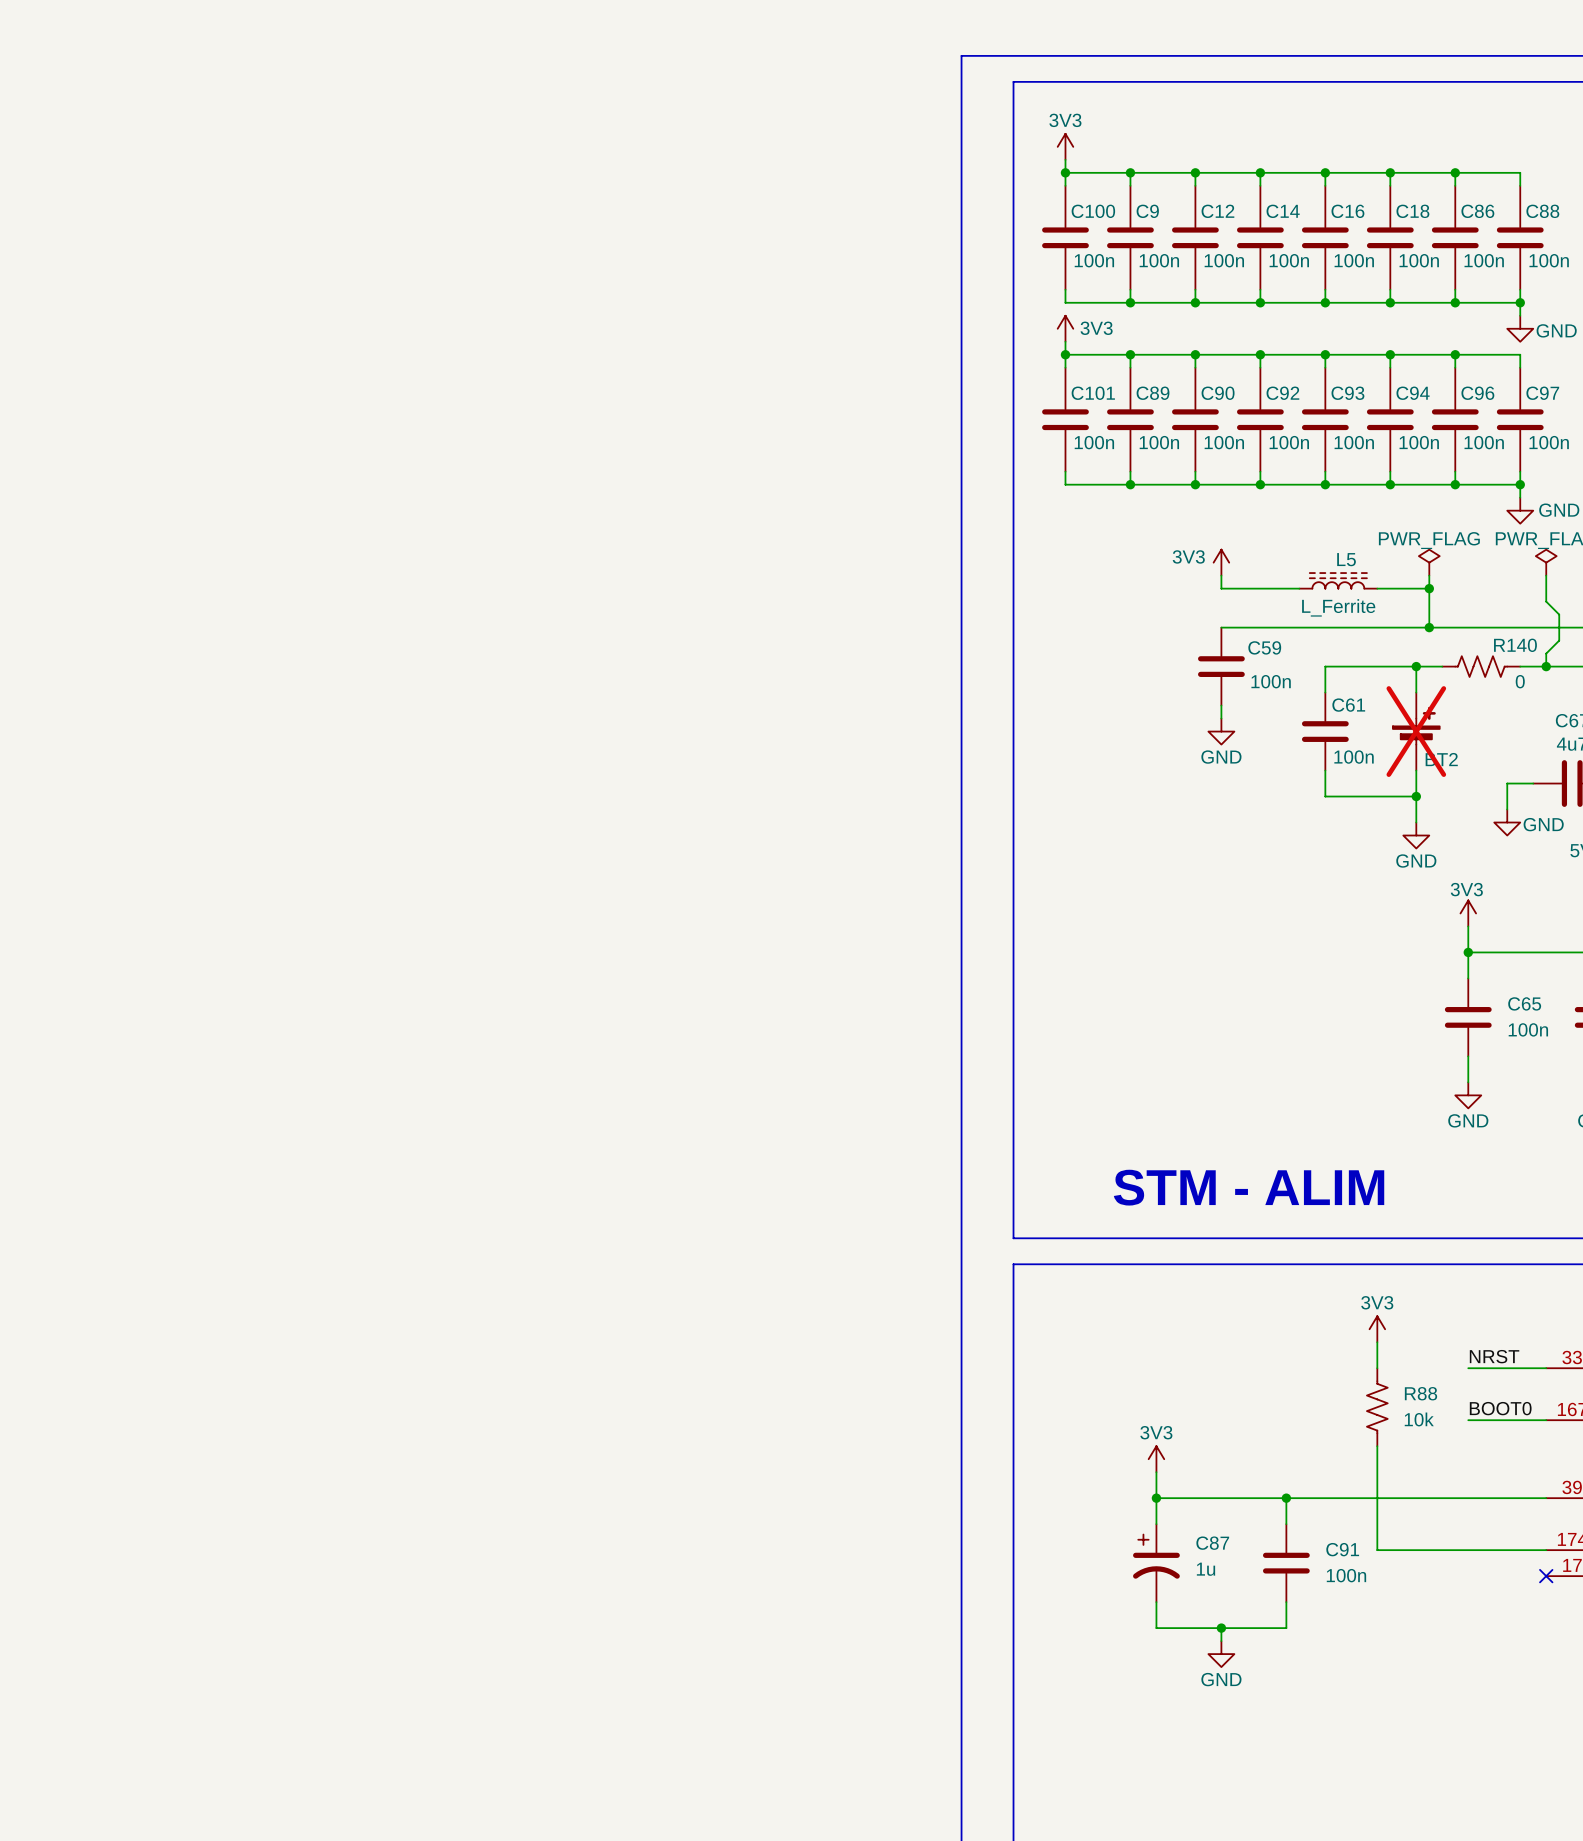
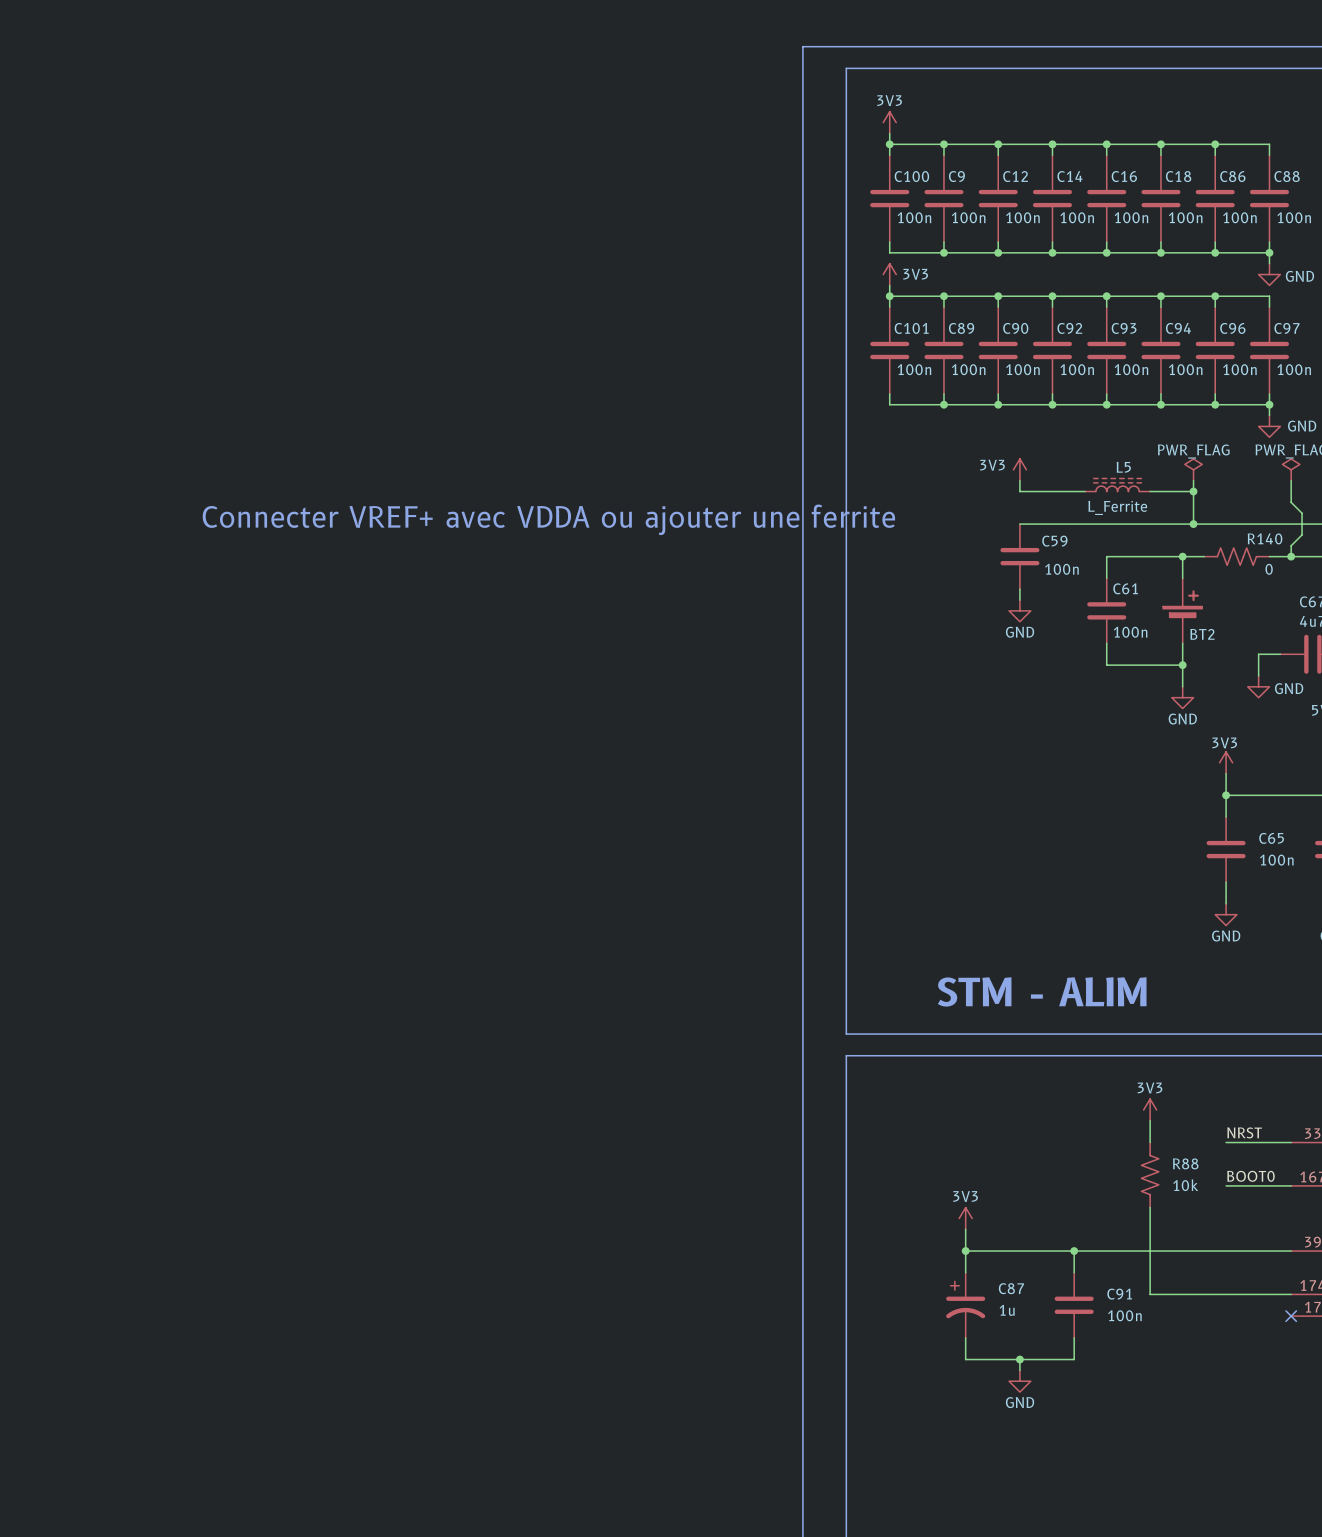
text: none -> Connecter VREF+ avec VDDA ou ajouter une ferrite (548, 519)
BT2 do-not-place cross: (1416, 731) -> none

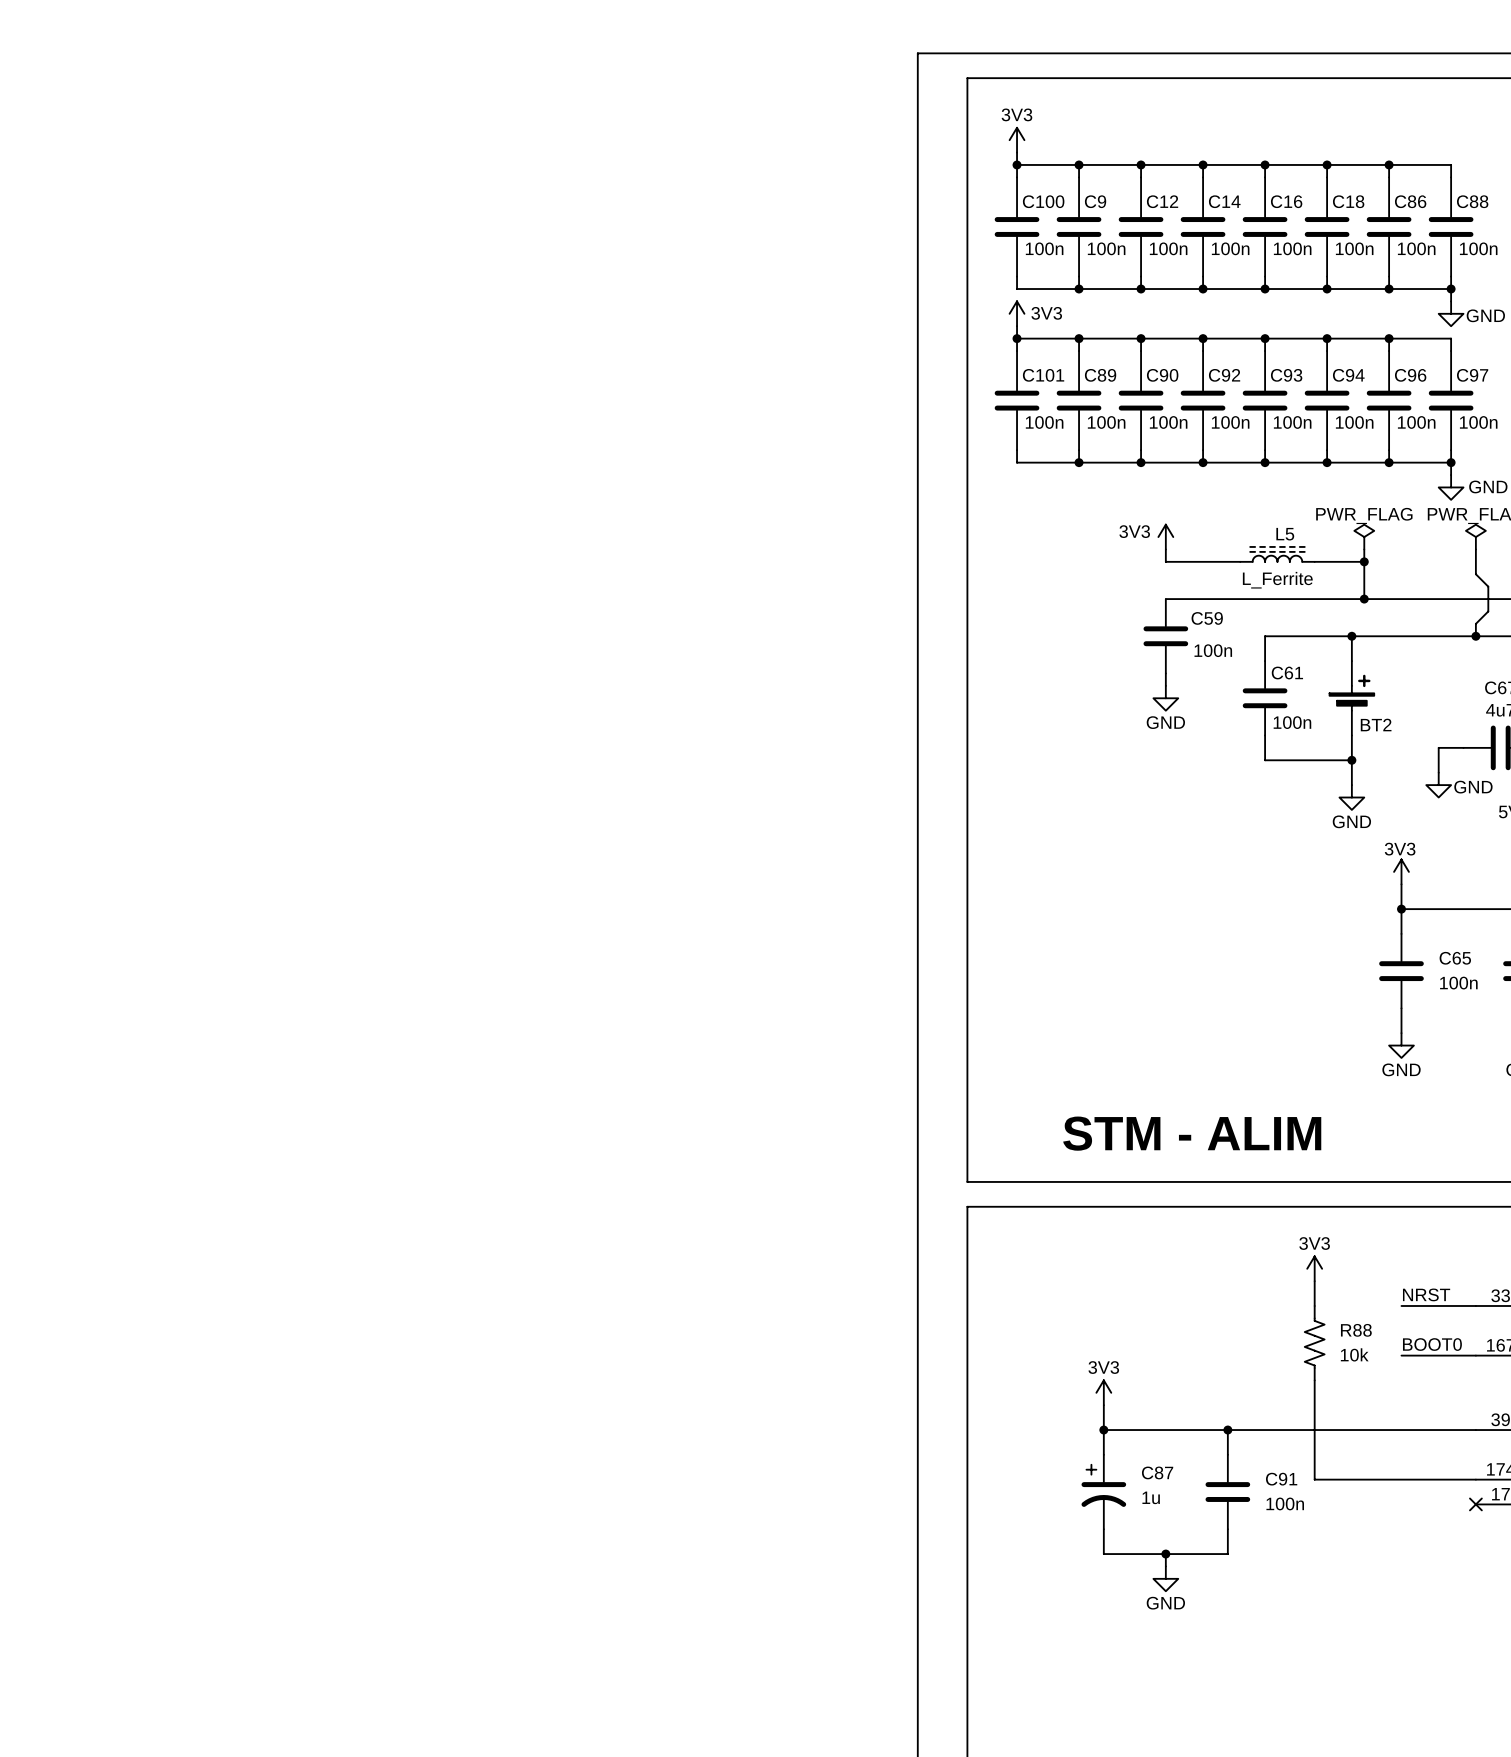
text: Connecter VREF+ avec VDDA ou ajouter une ferrite (548, 519) -> none
R140: 0 (1236, 556) -> none

